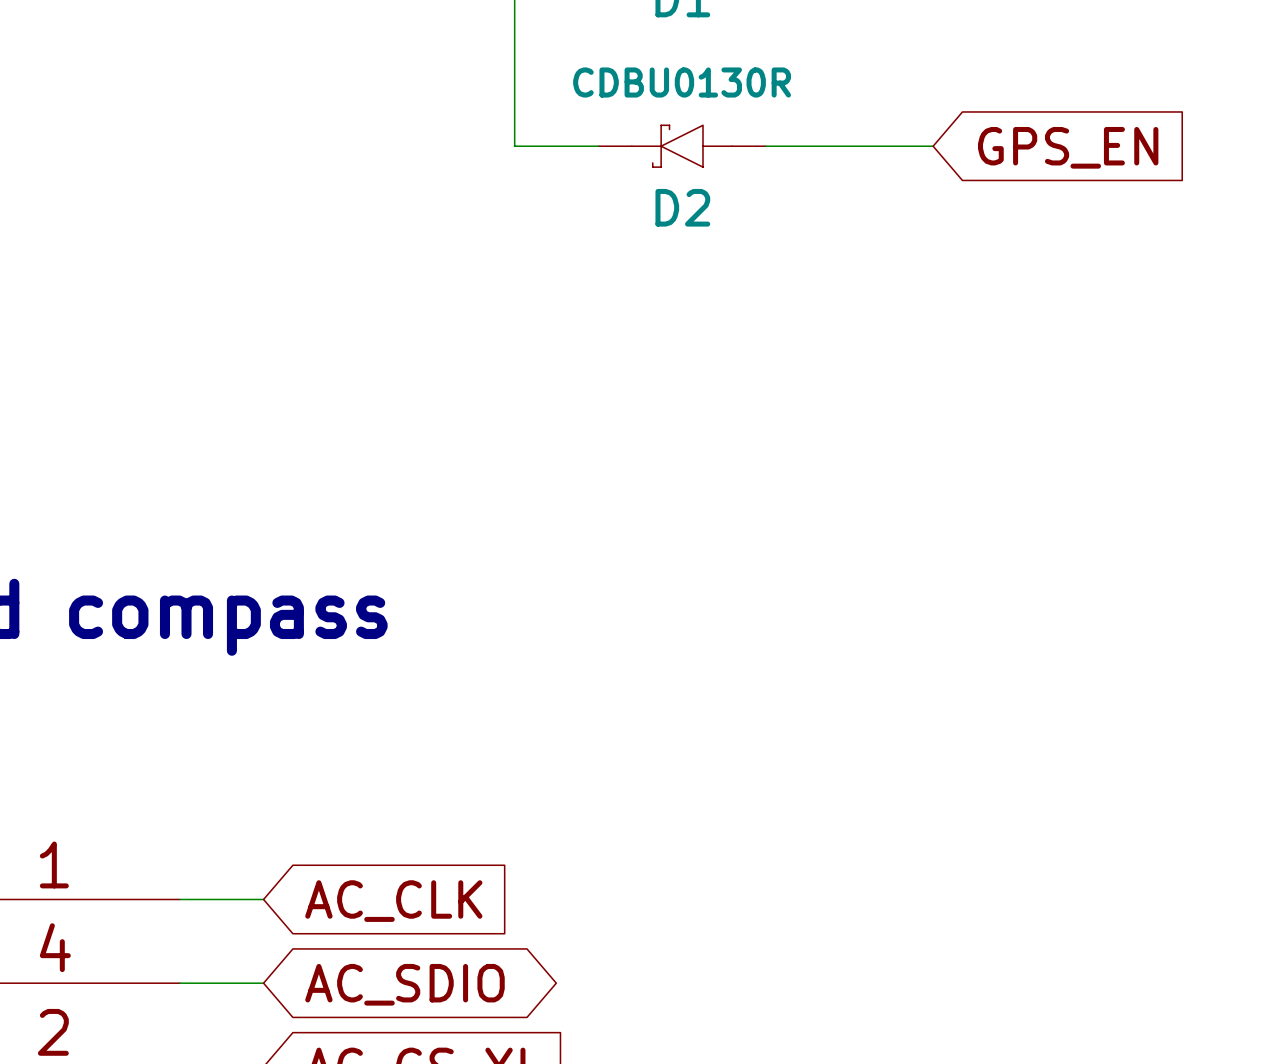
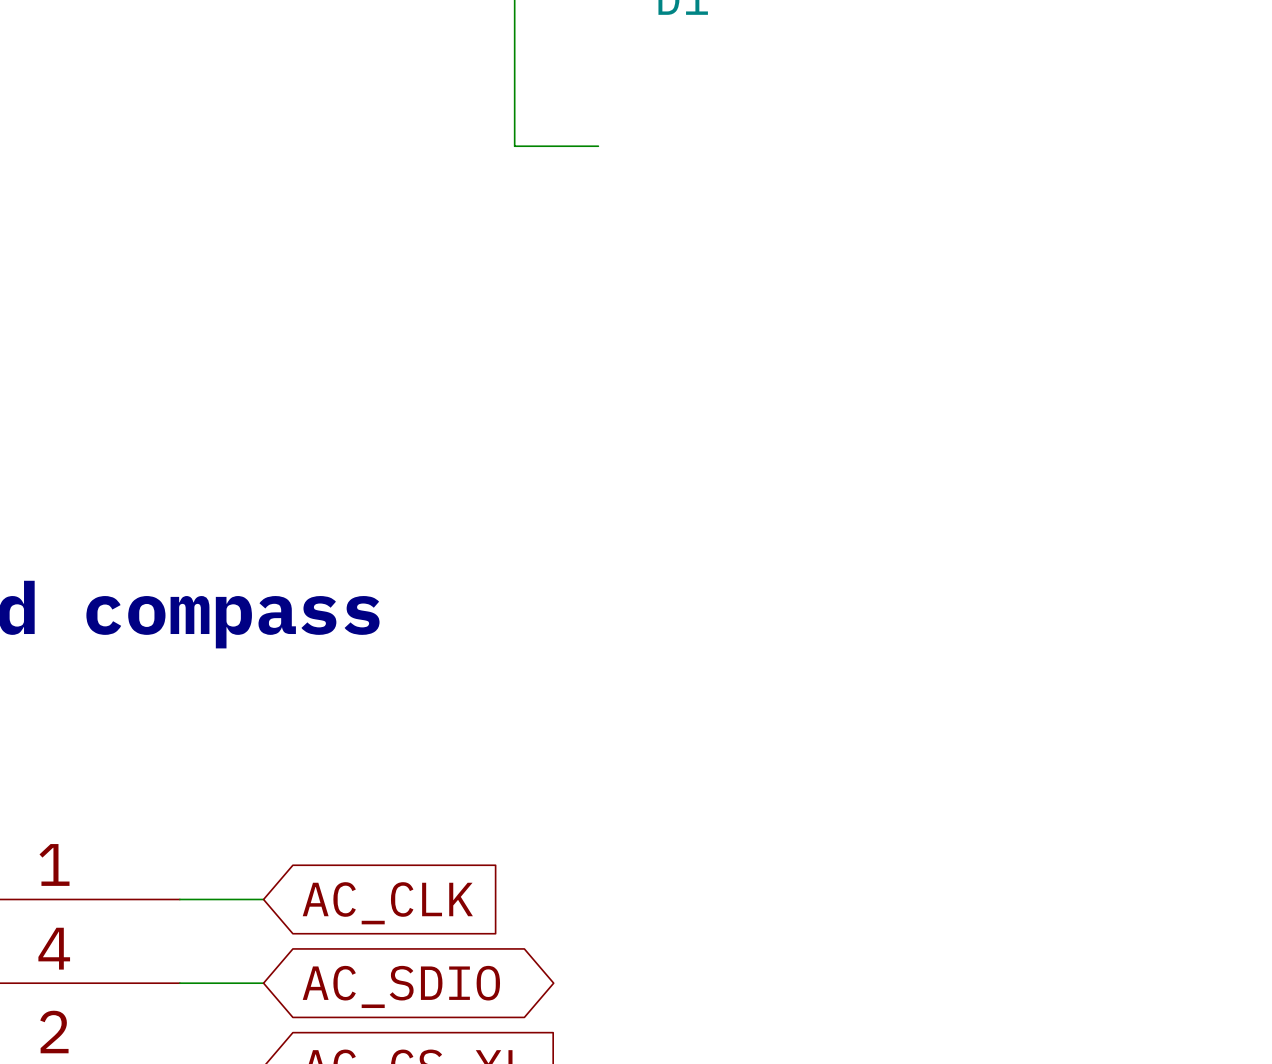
D2: CDBU0130R (682, 146) -> none
wire: (765, 146) (933, 146) -> none
global label: GPS_EN (1068, 147) -> none

